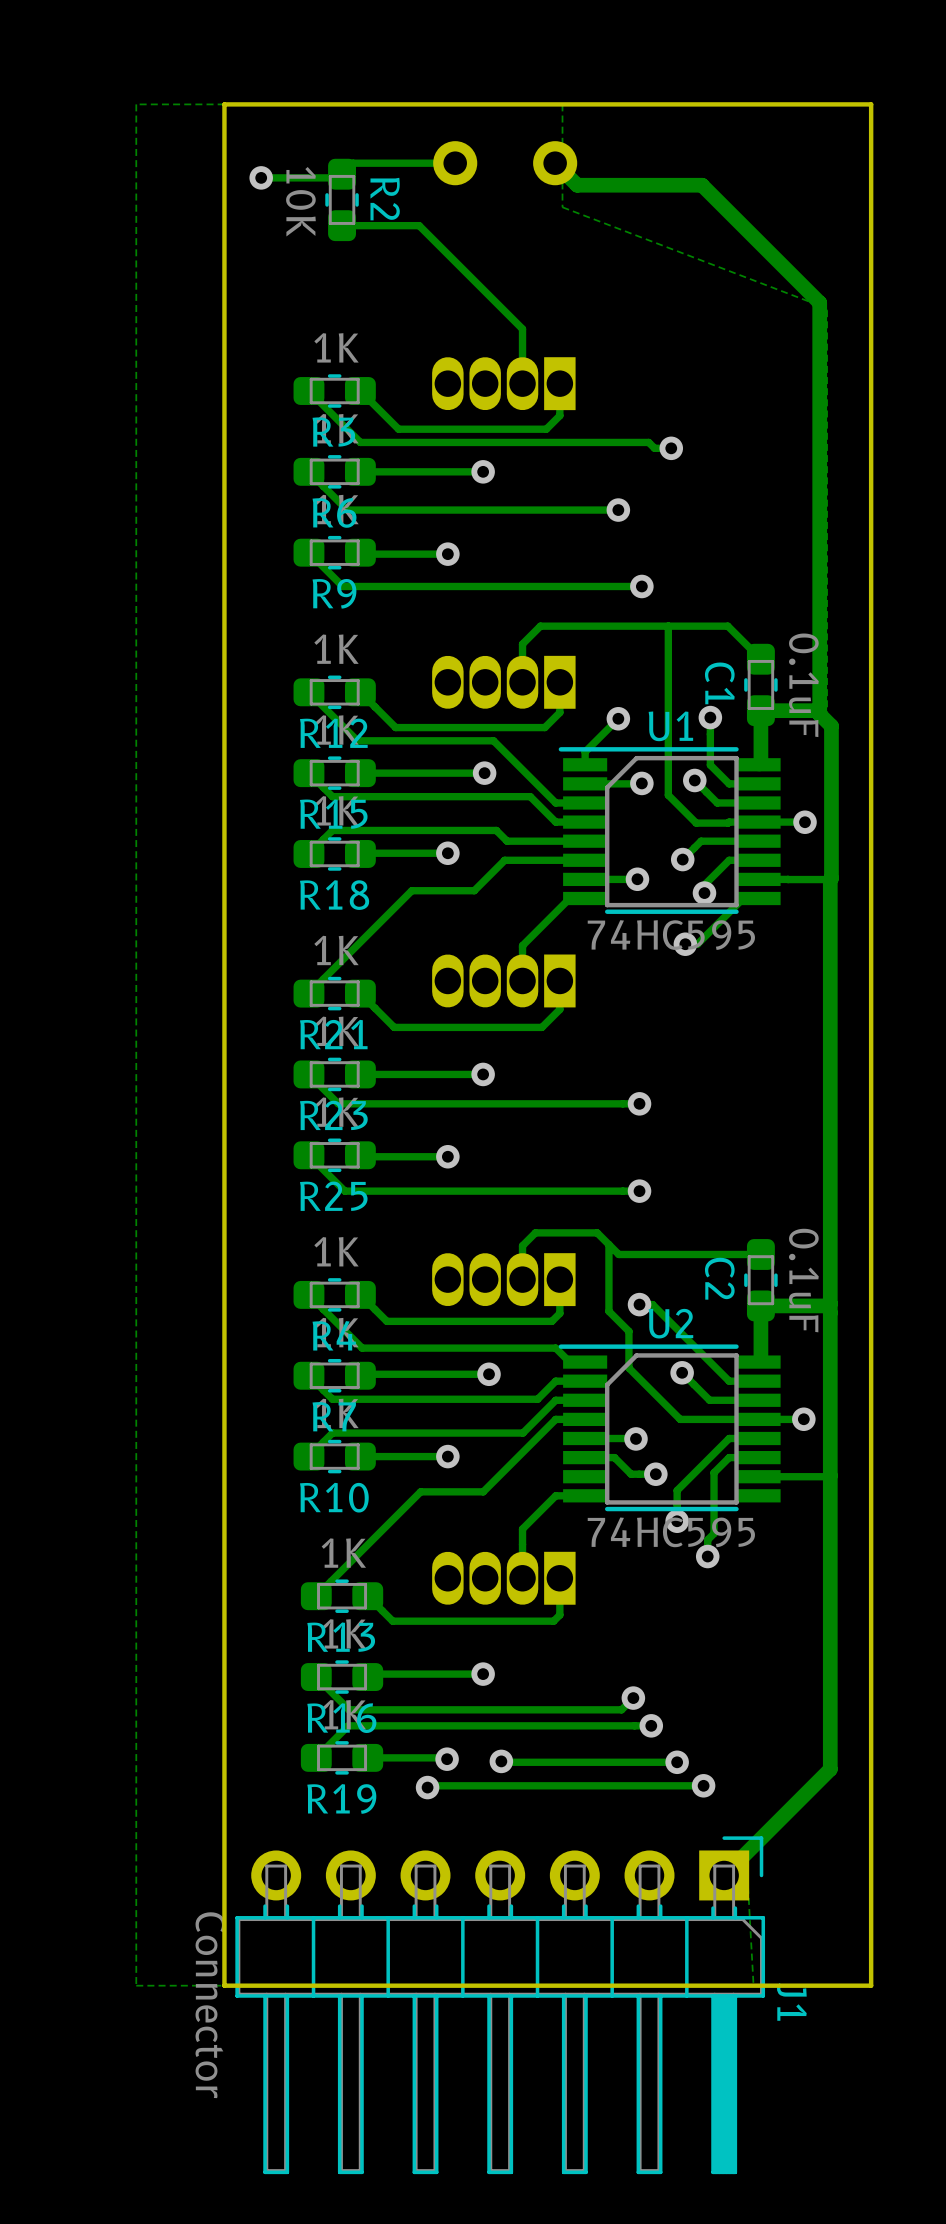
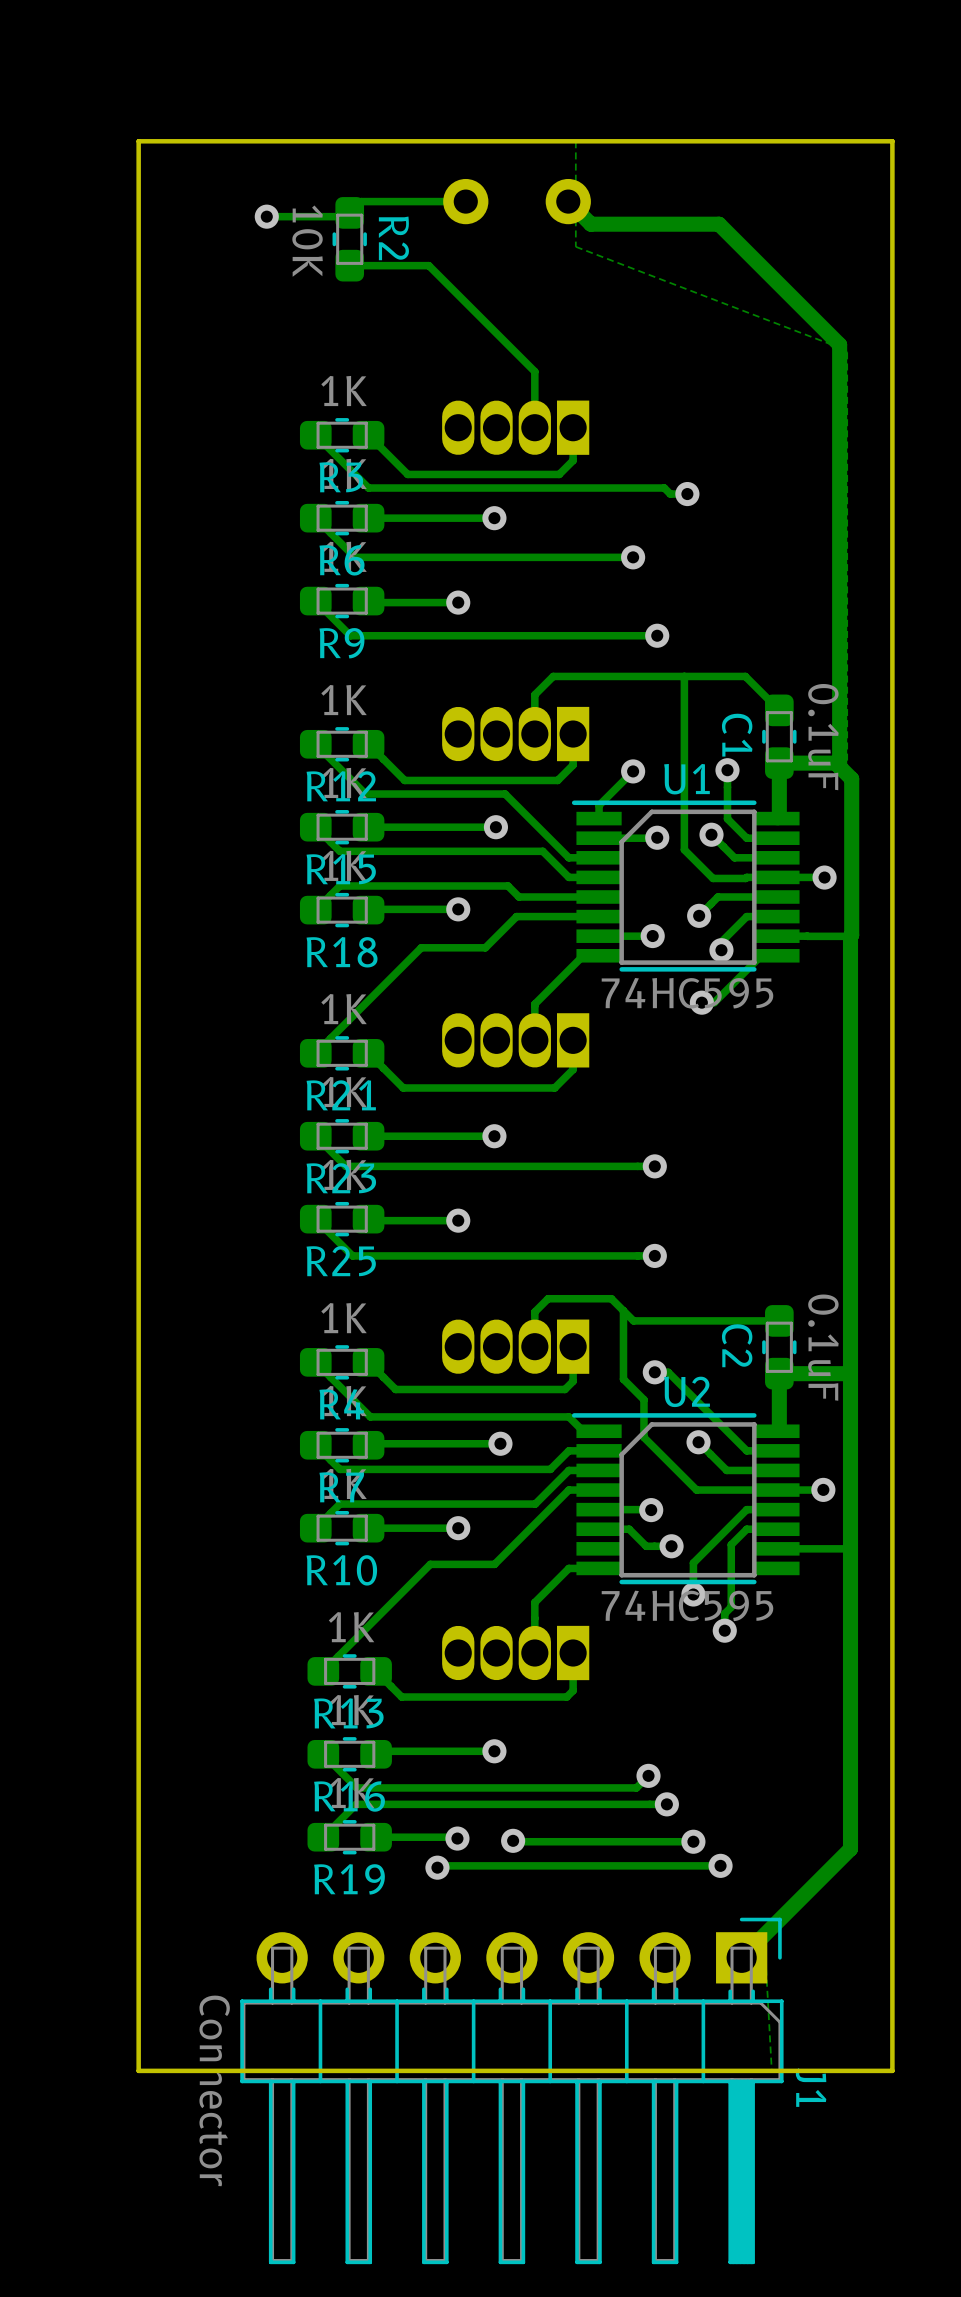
board edge: (224, 104) (224, 1985) -> (229, 141) (138, 141) (138, 2070) (229, 2070)

